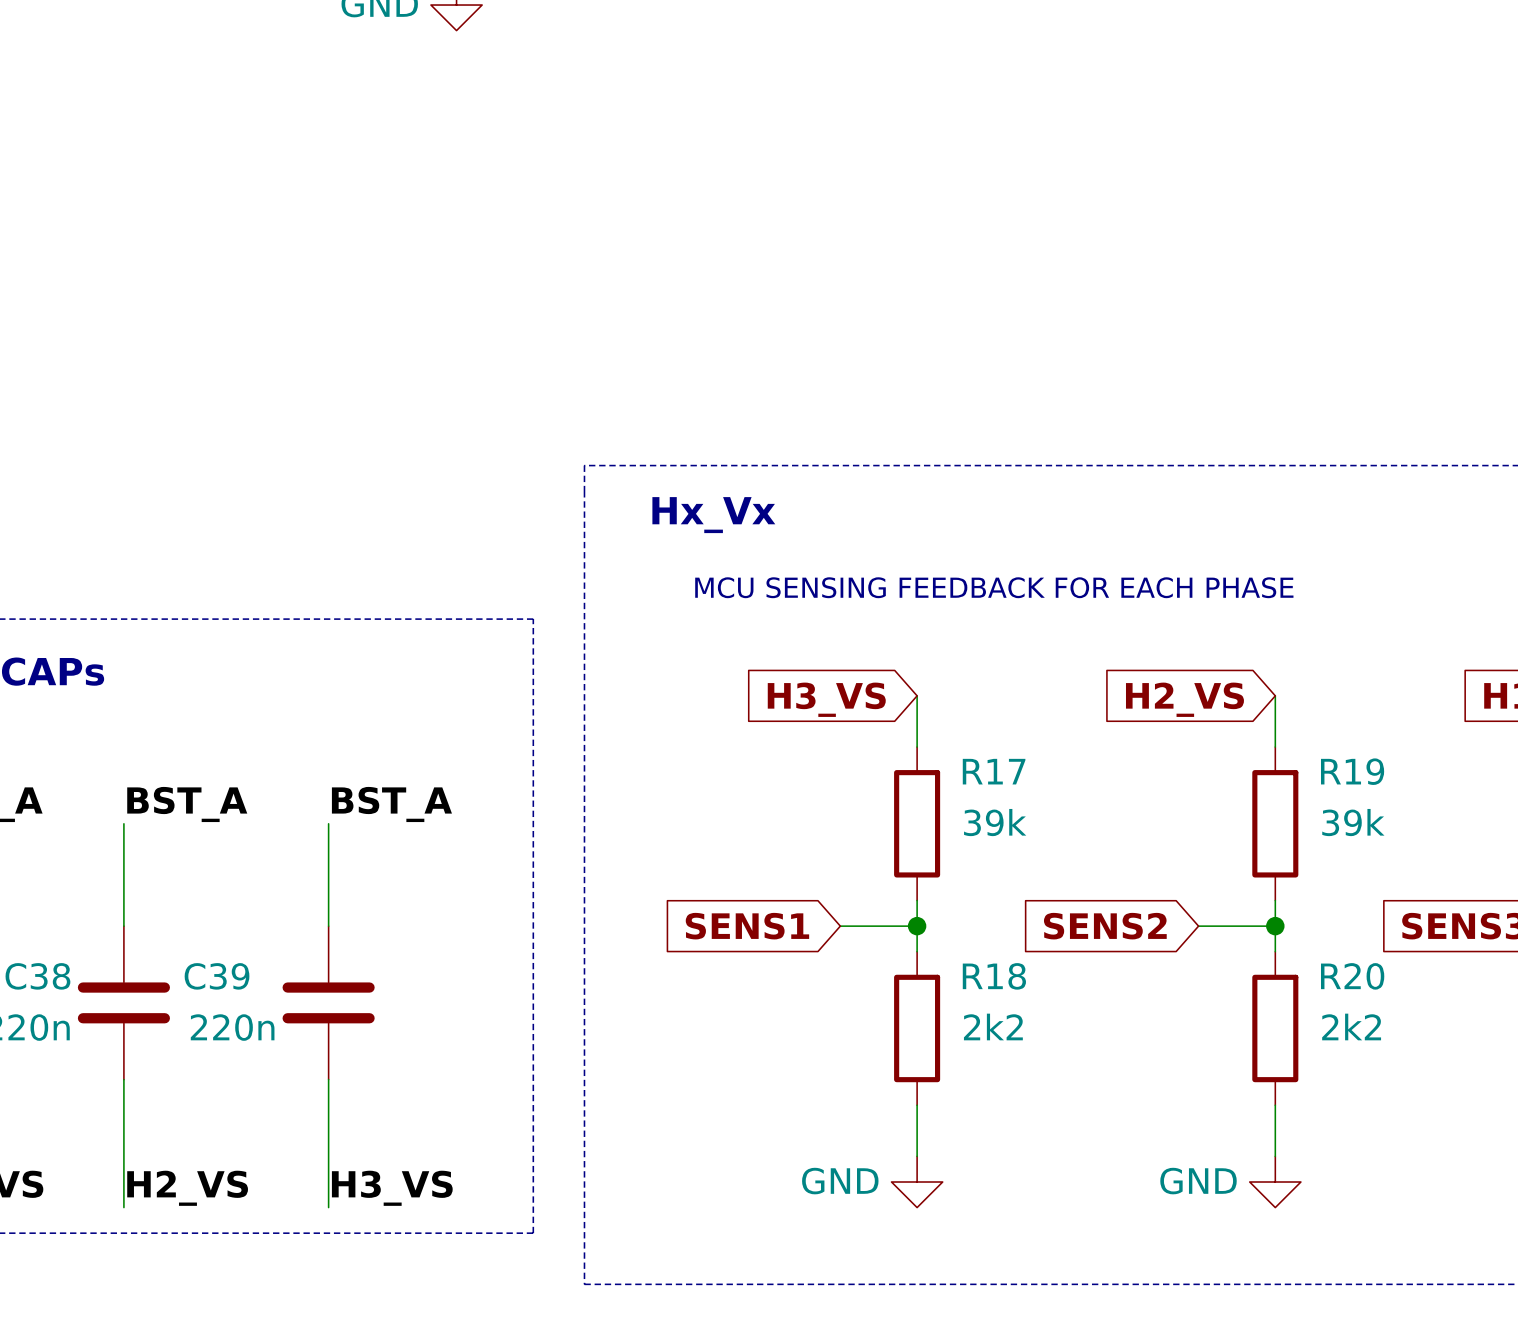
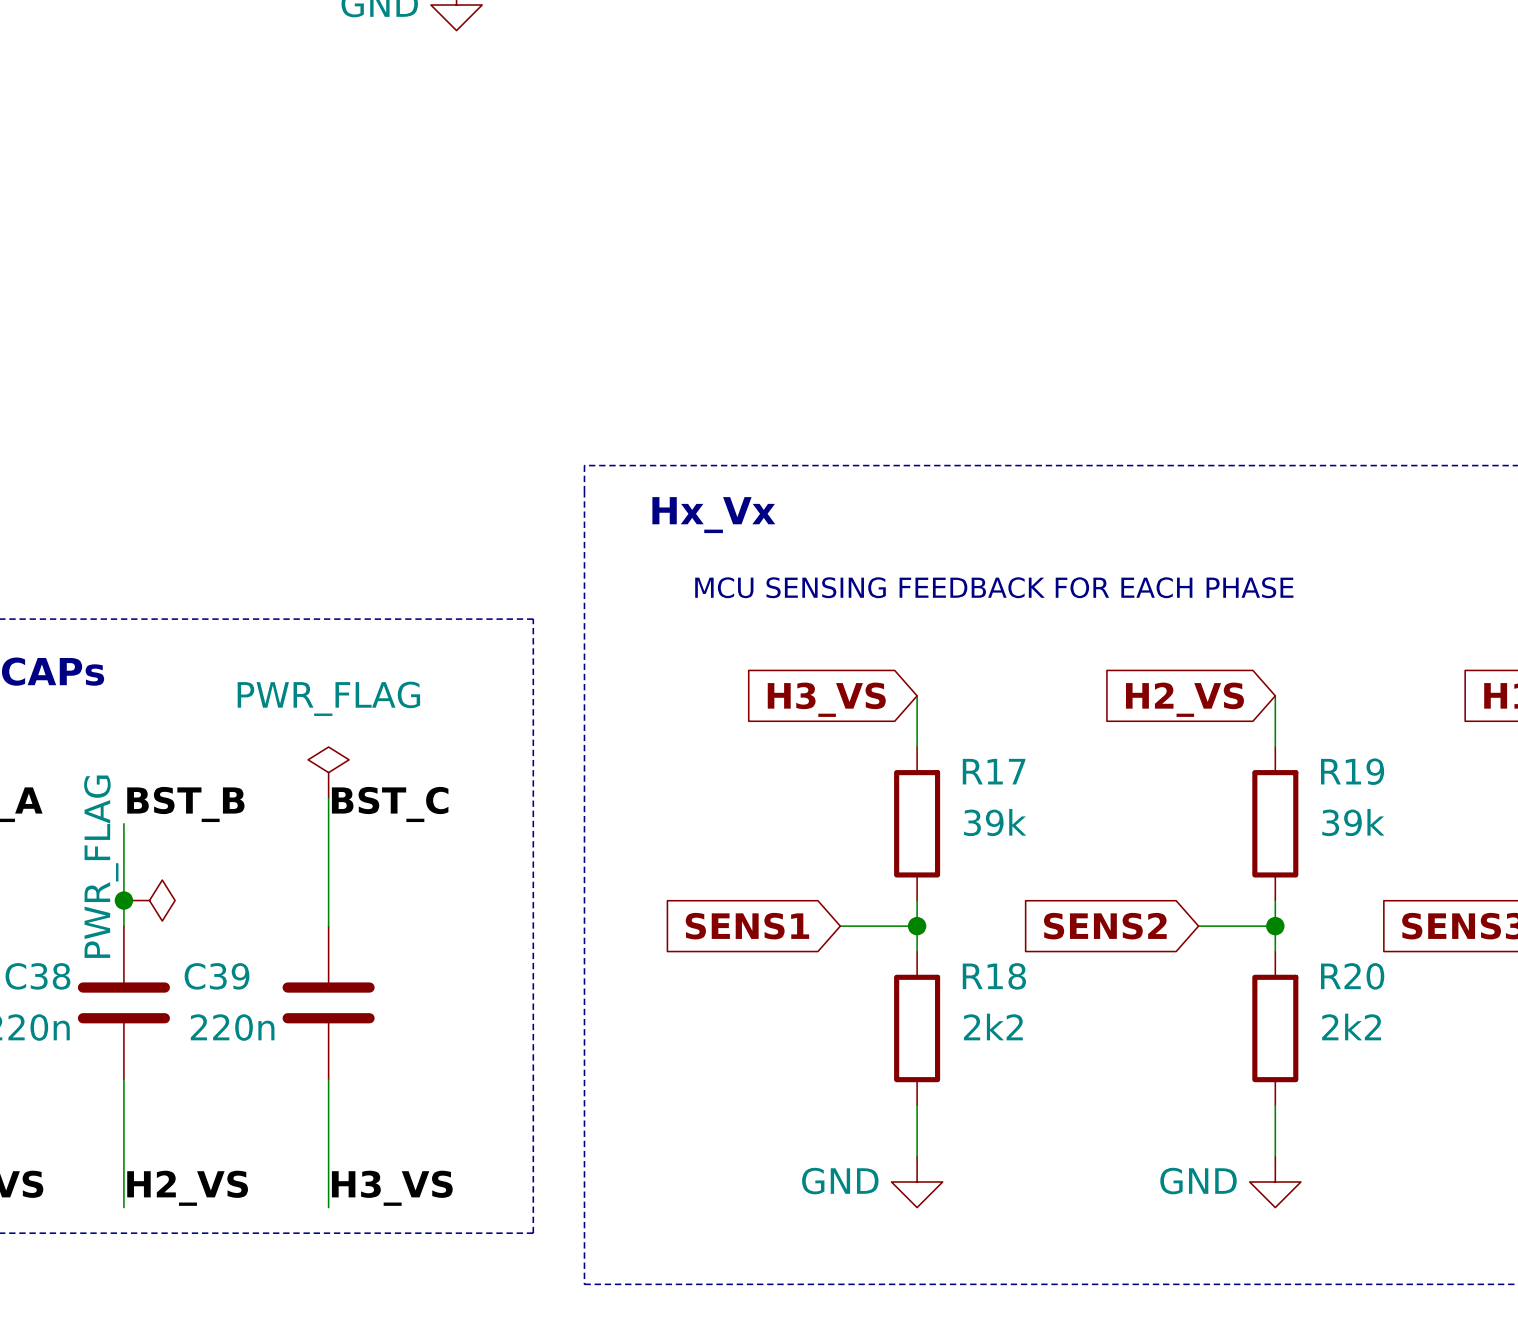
power symbol: none -> PWR_FLAG (328, 772)
wire: none -> (328, 798) (328, 823)
label: BST_A (187, 804) -> BST_B (185, 804)
label: BST_A (391, 804) -> BST_C (390, 804)
junction: none -> (123, 900)
power symbol: none -> PWR_FLAG (149, 900)

